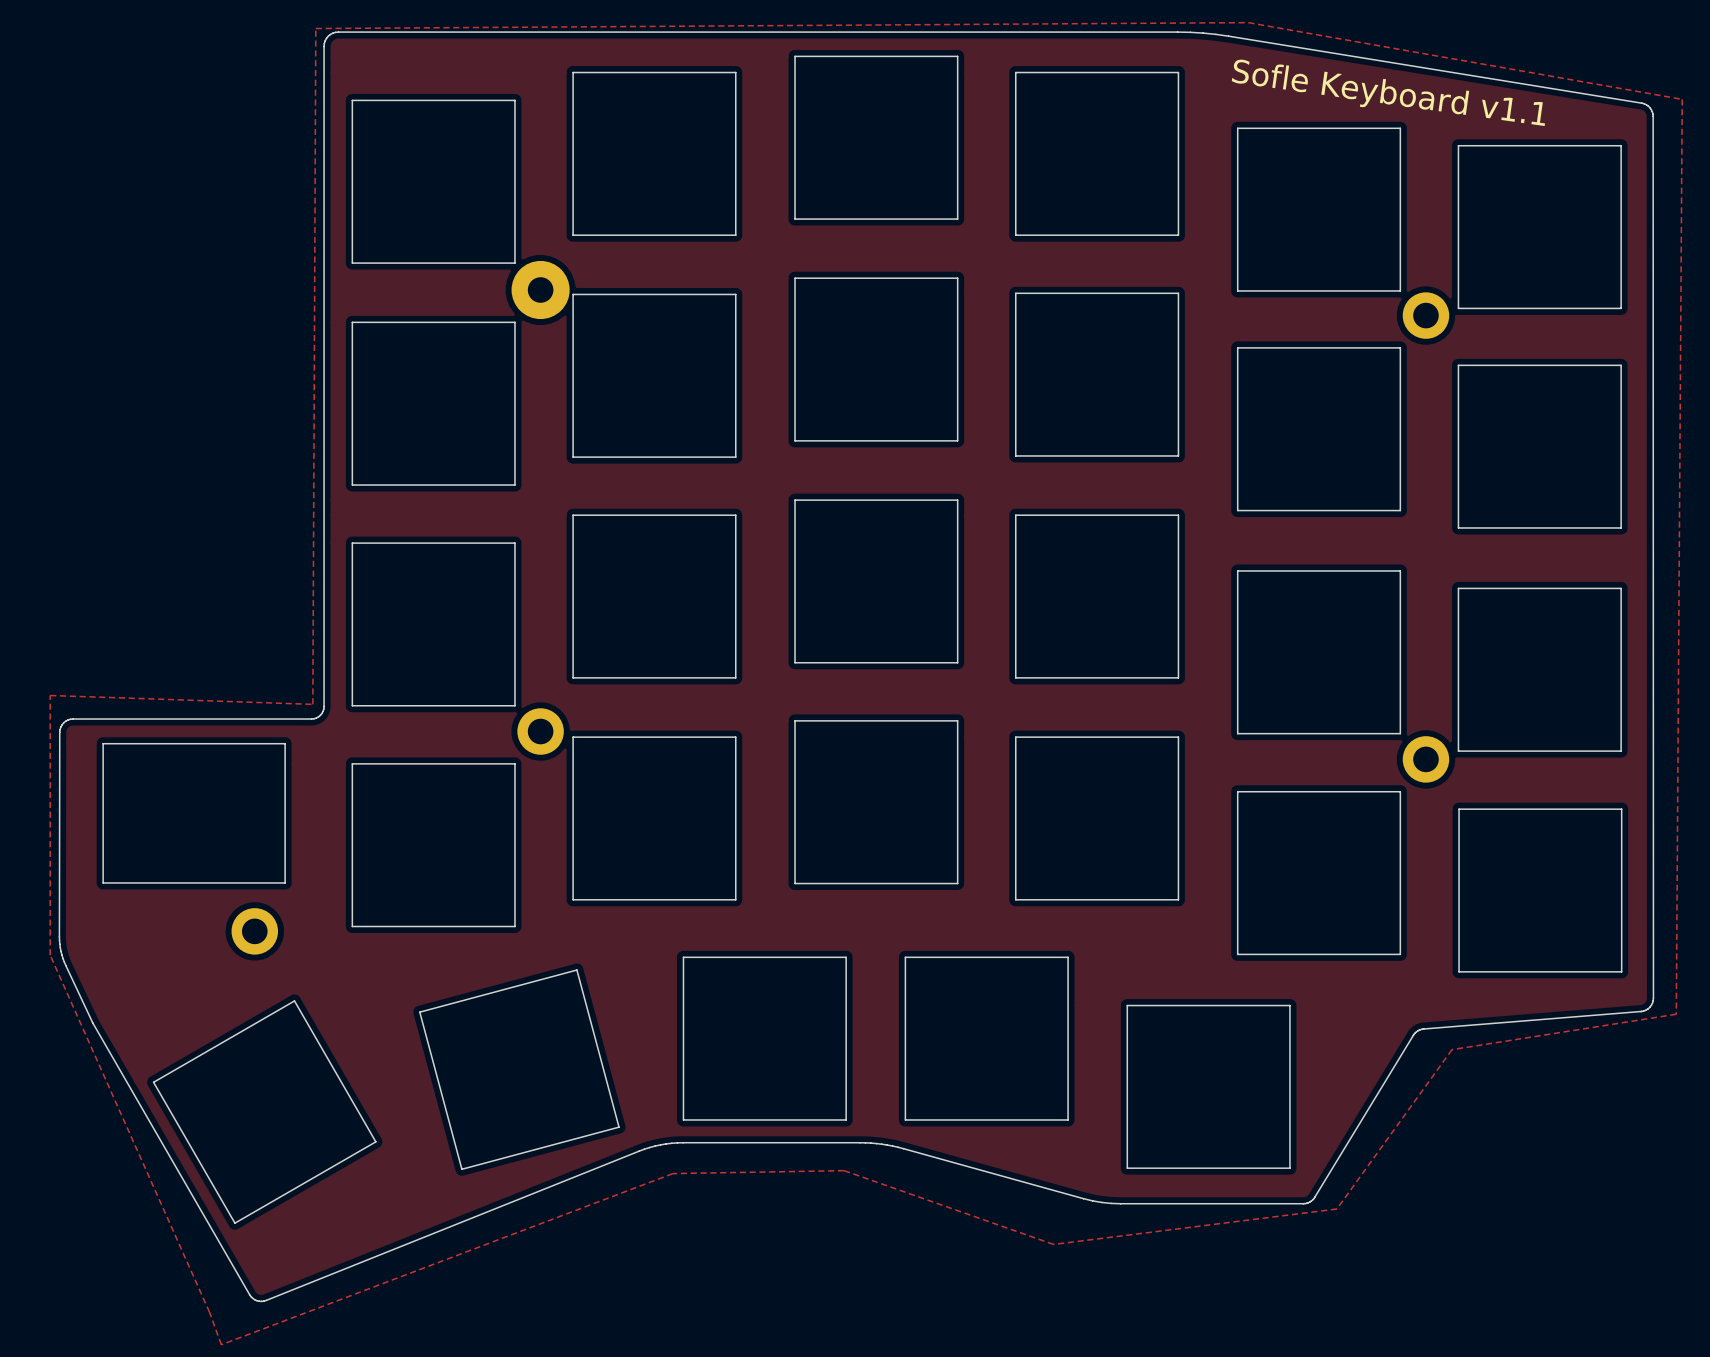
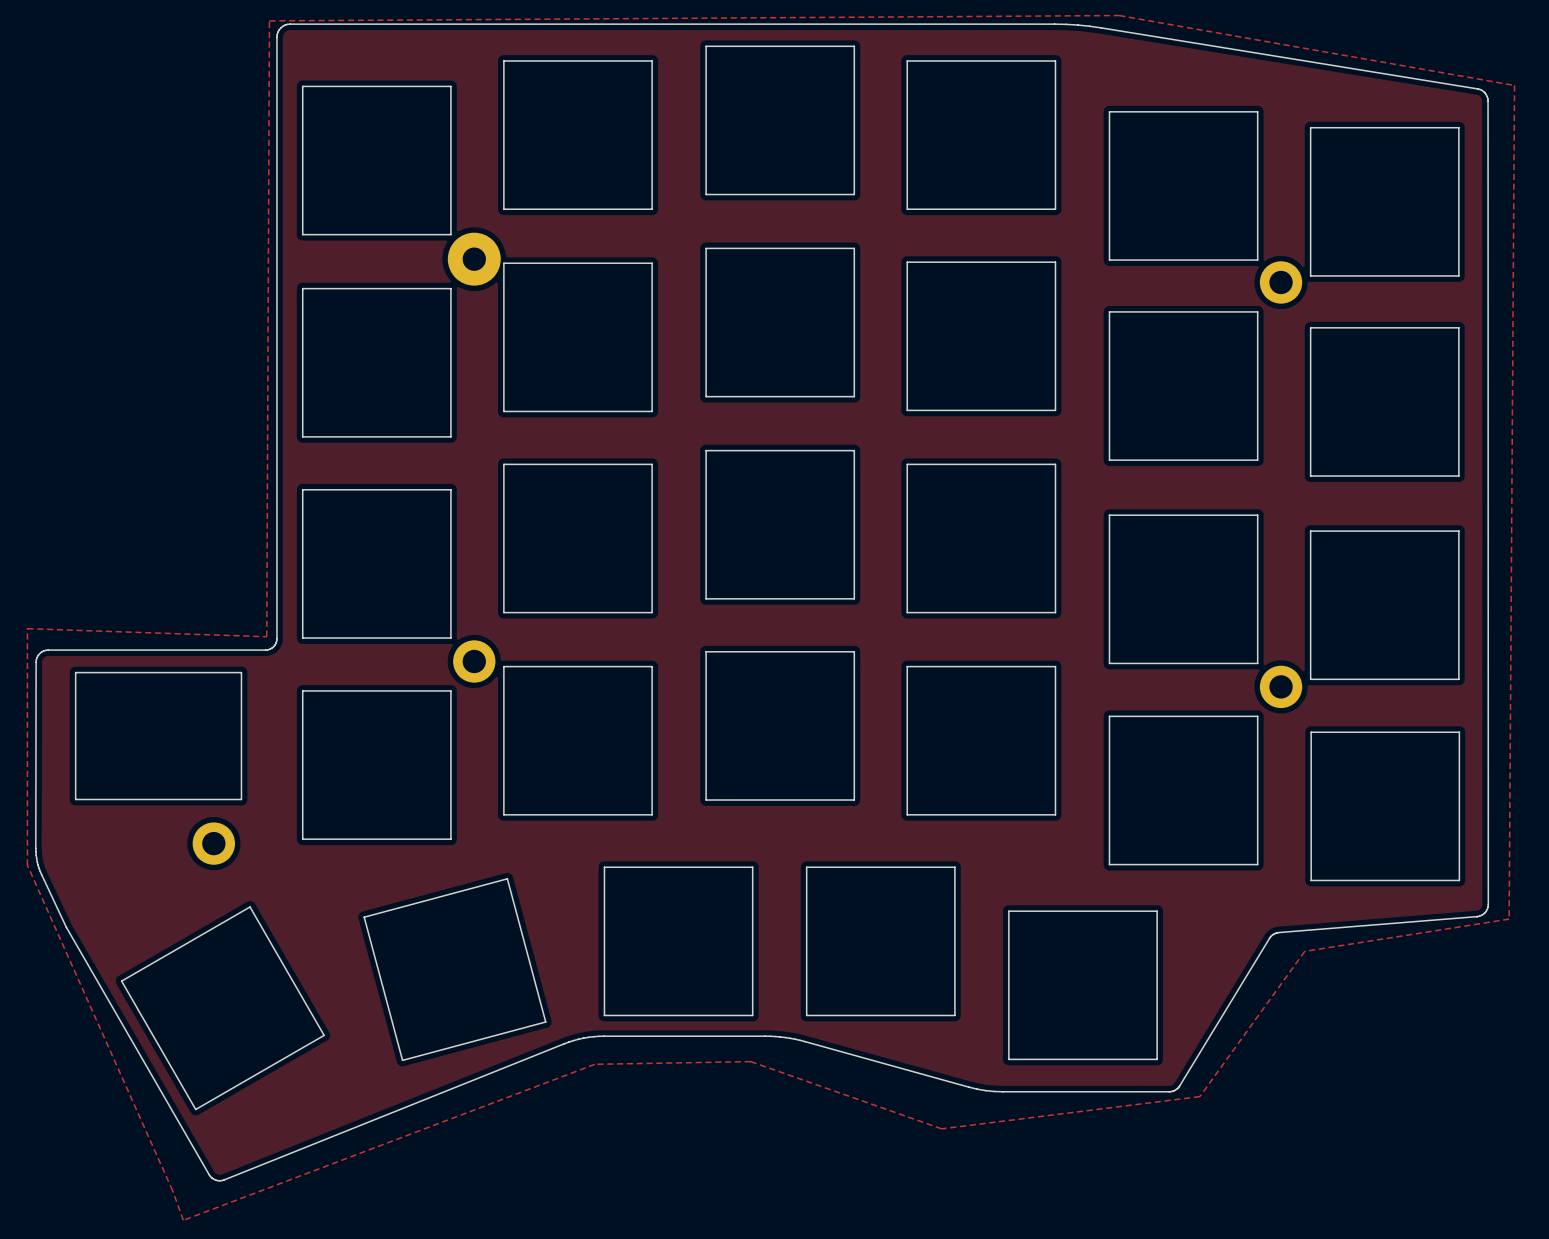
text: Sofle Keyboard v1.1 (1388, 92) -> none

